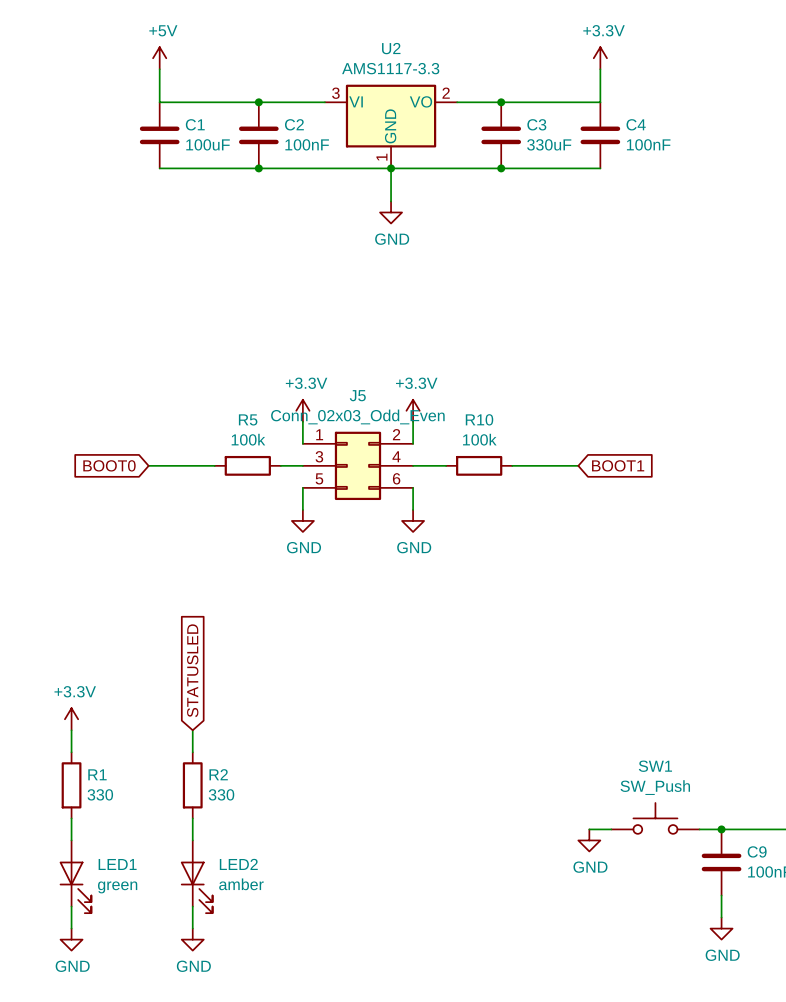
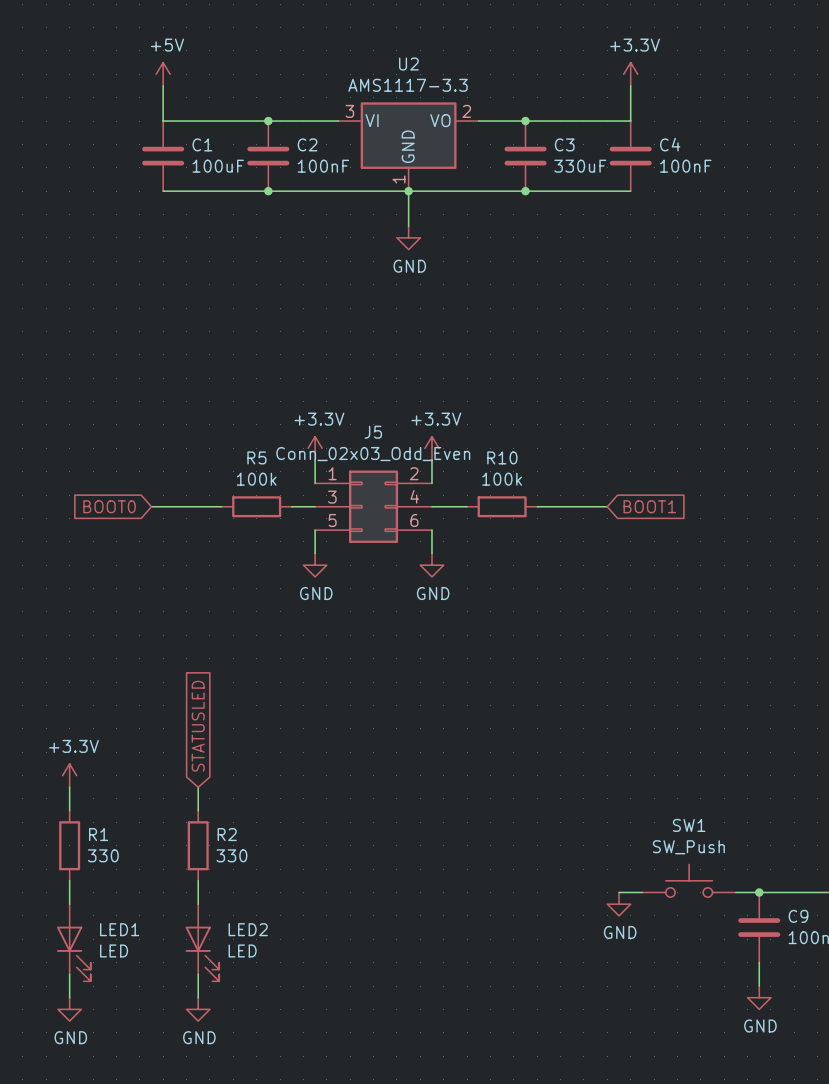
LED2 value: amber (241, 884) -> LED (242, 950)
LED1 value: green (117, 887) -> LED (114, 950)

